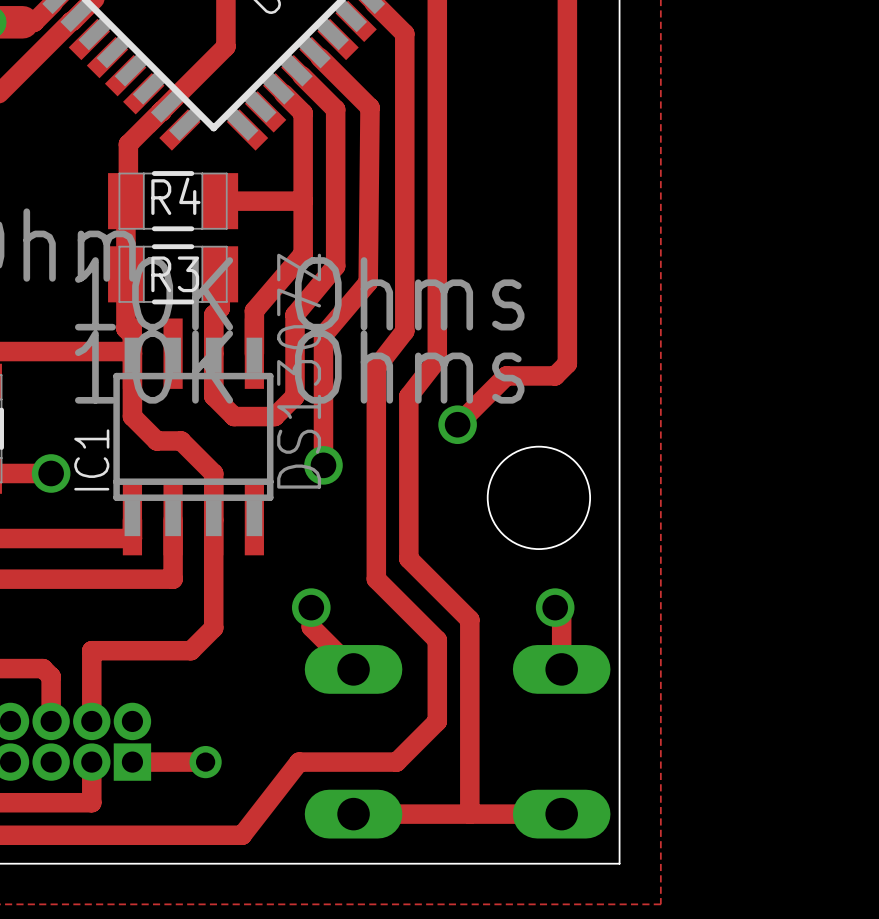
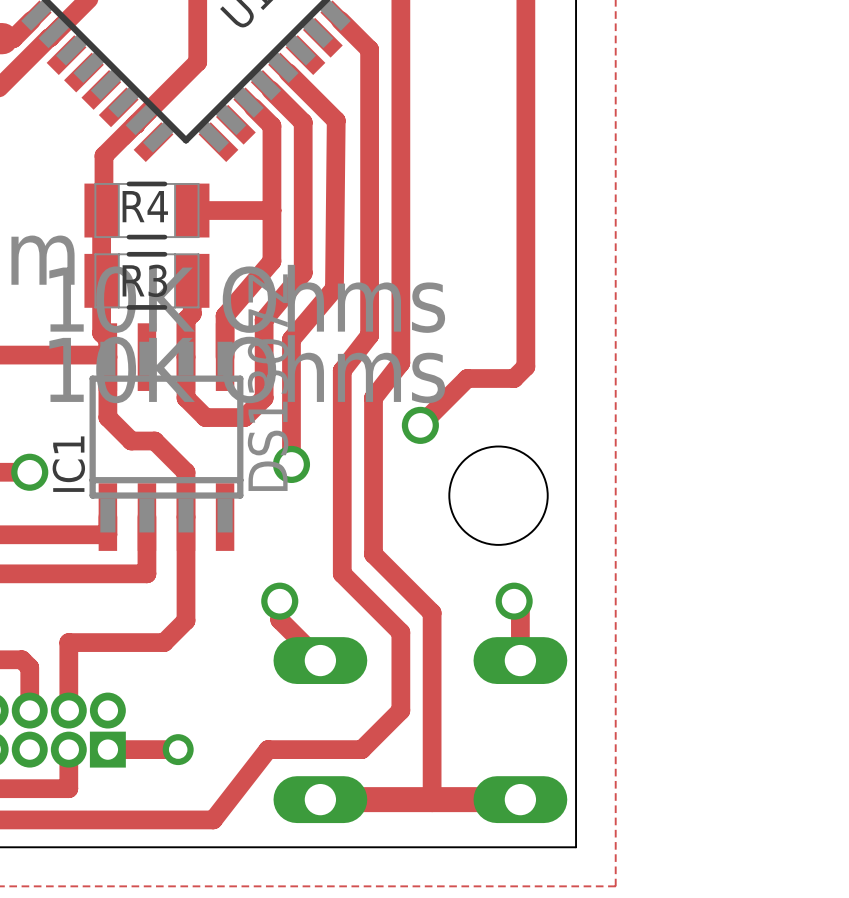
track width: thin (353, 814) (561, 814) -> thick (320, 799) (520, 799)

